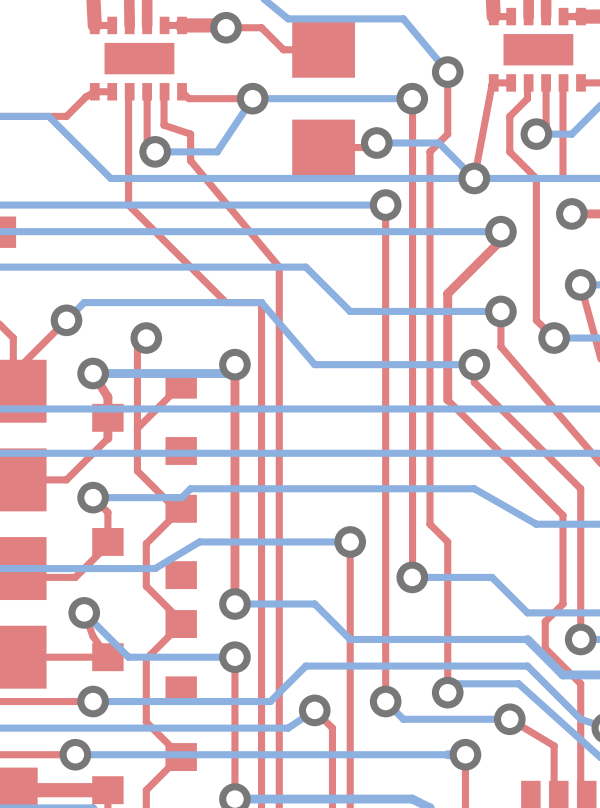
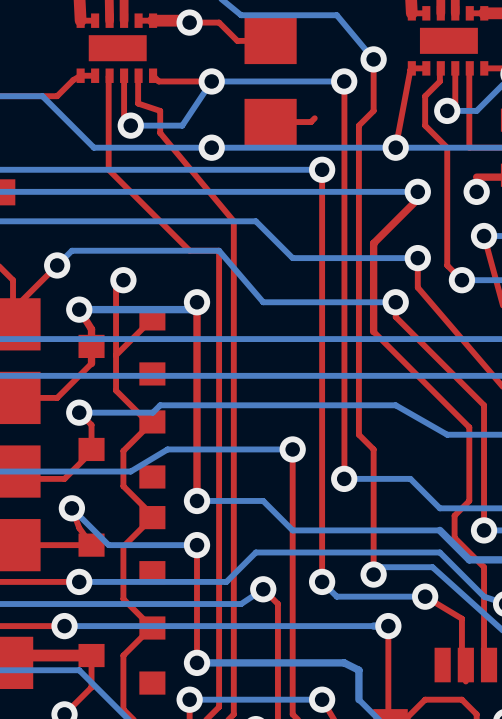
bottom track: (376, 143) (438, 143) (474, 178) -> none
via: (376, 143) -> none
via: none -> (211, 147)
via position: (571, 213) -> (476, 191)

